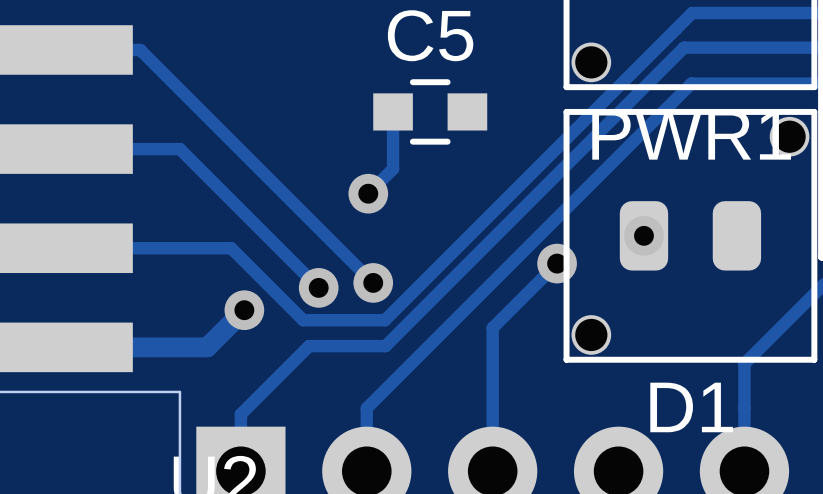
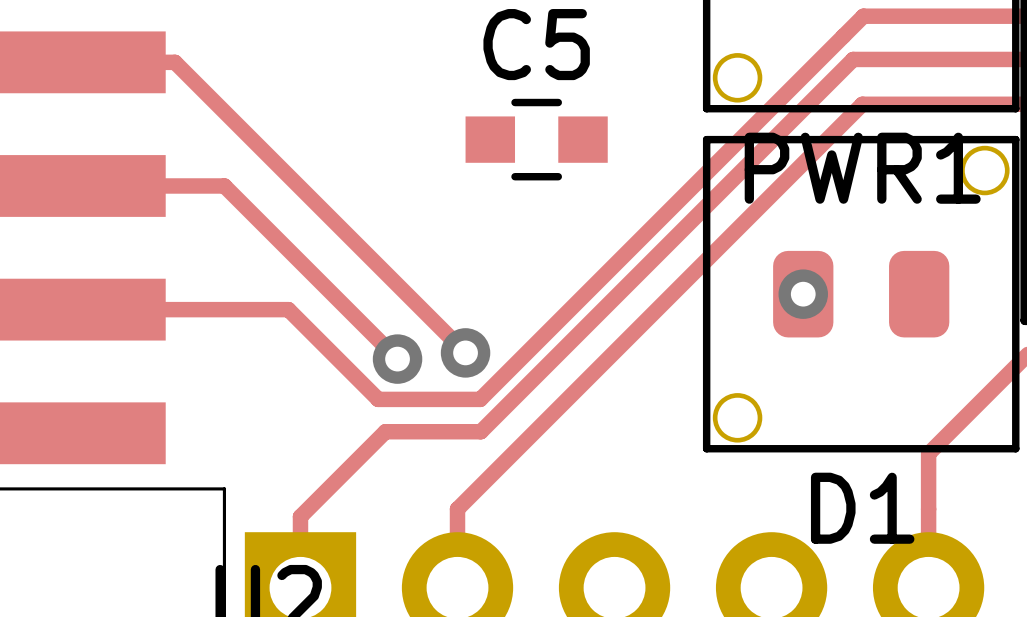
track: (393, 111) (393, 168) (368, 193) -> none
via: (368, 193) -> none
track: (557, 263) (492, 327) (492, 471) -> none
via: (557, 263) -> none
track: (244, 310) (207, 347) (58, 347) -> none
via: (244, 310) -> none

